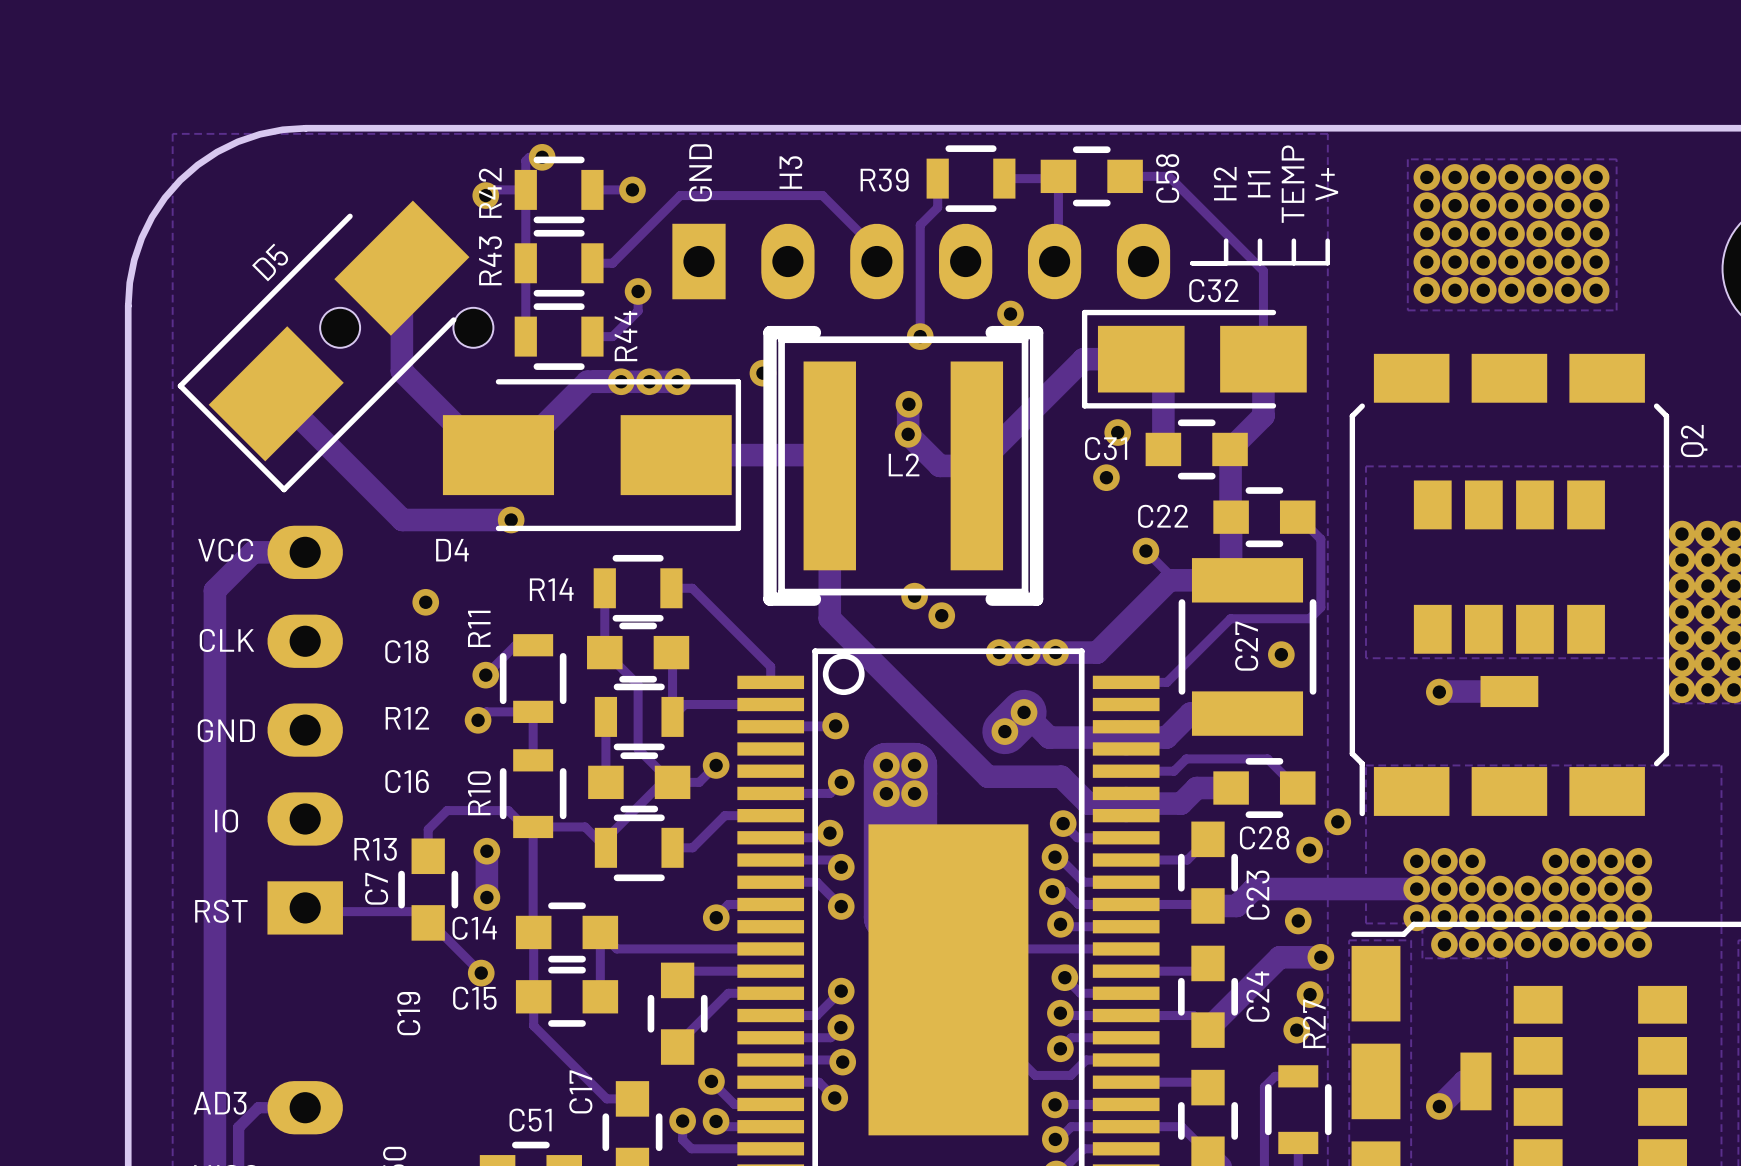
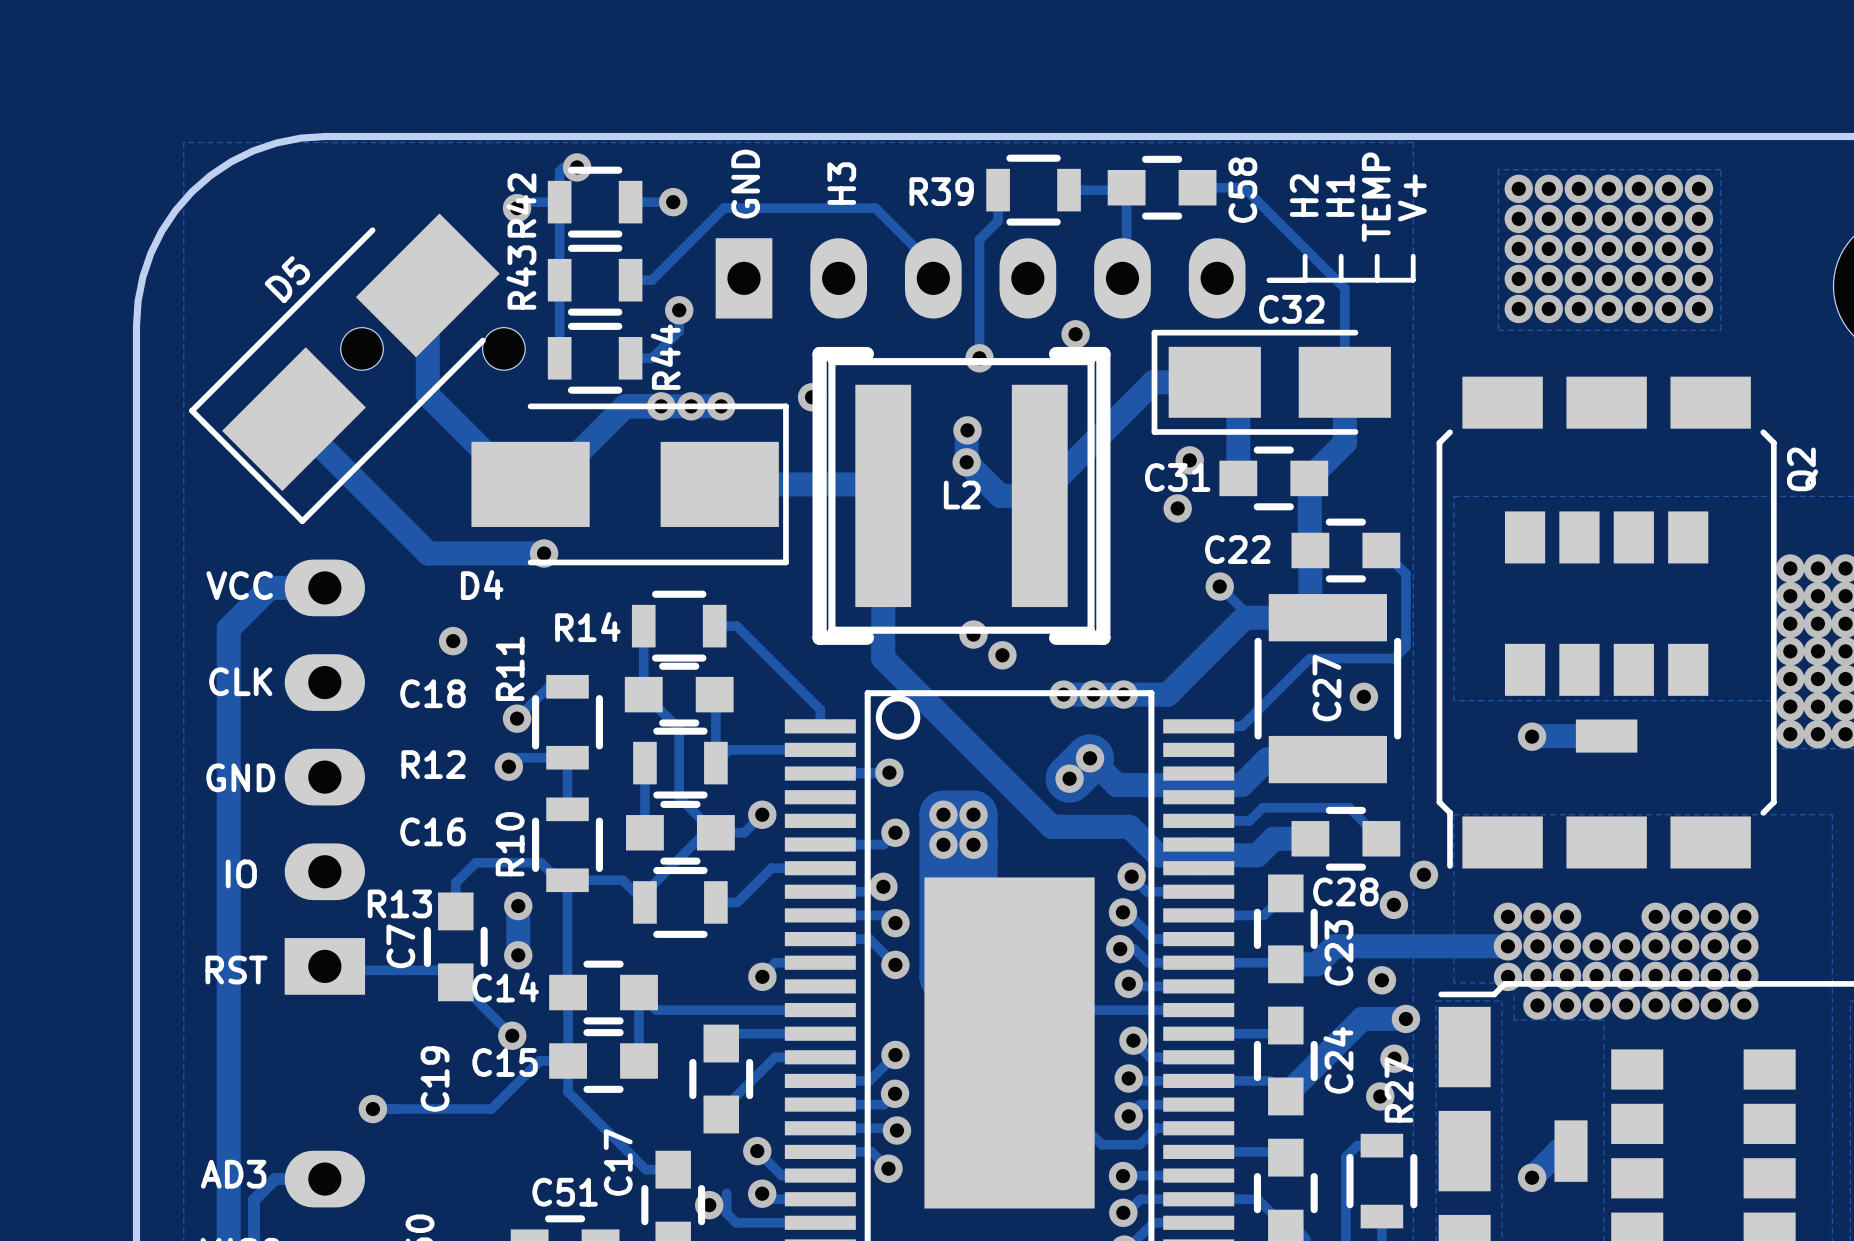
track: none -> (568, 1060) (539, 1060) (491, 1109) (372, 1109)
via: none -> (372, 1109)
via position: (682, 1121) -> (709, 1205)

